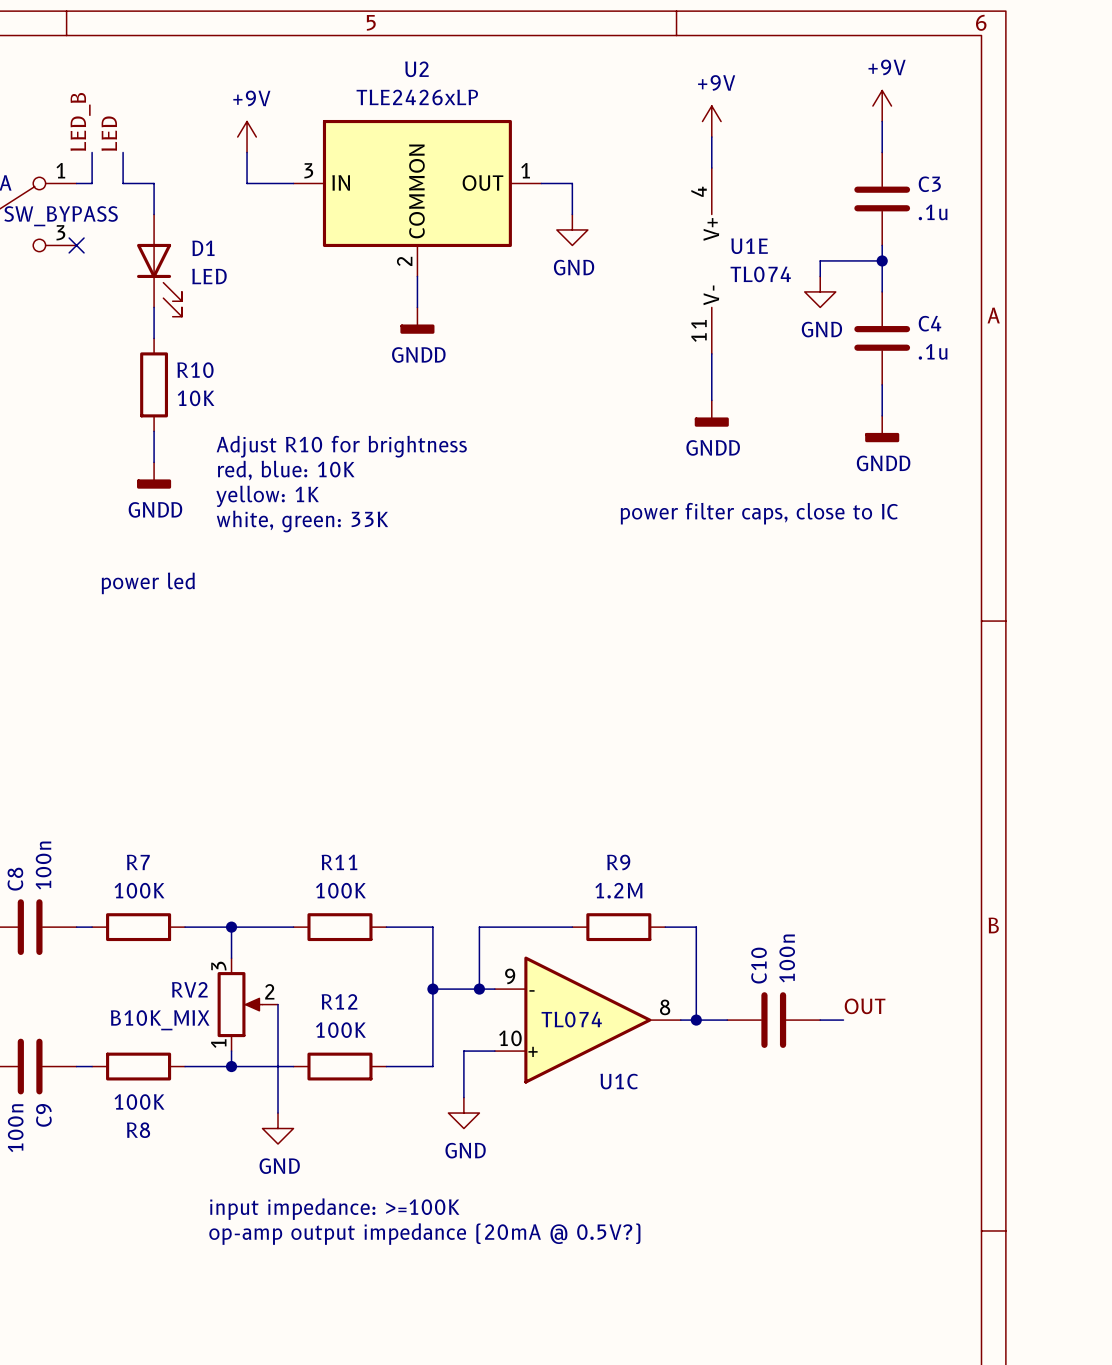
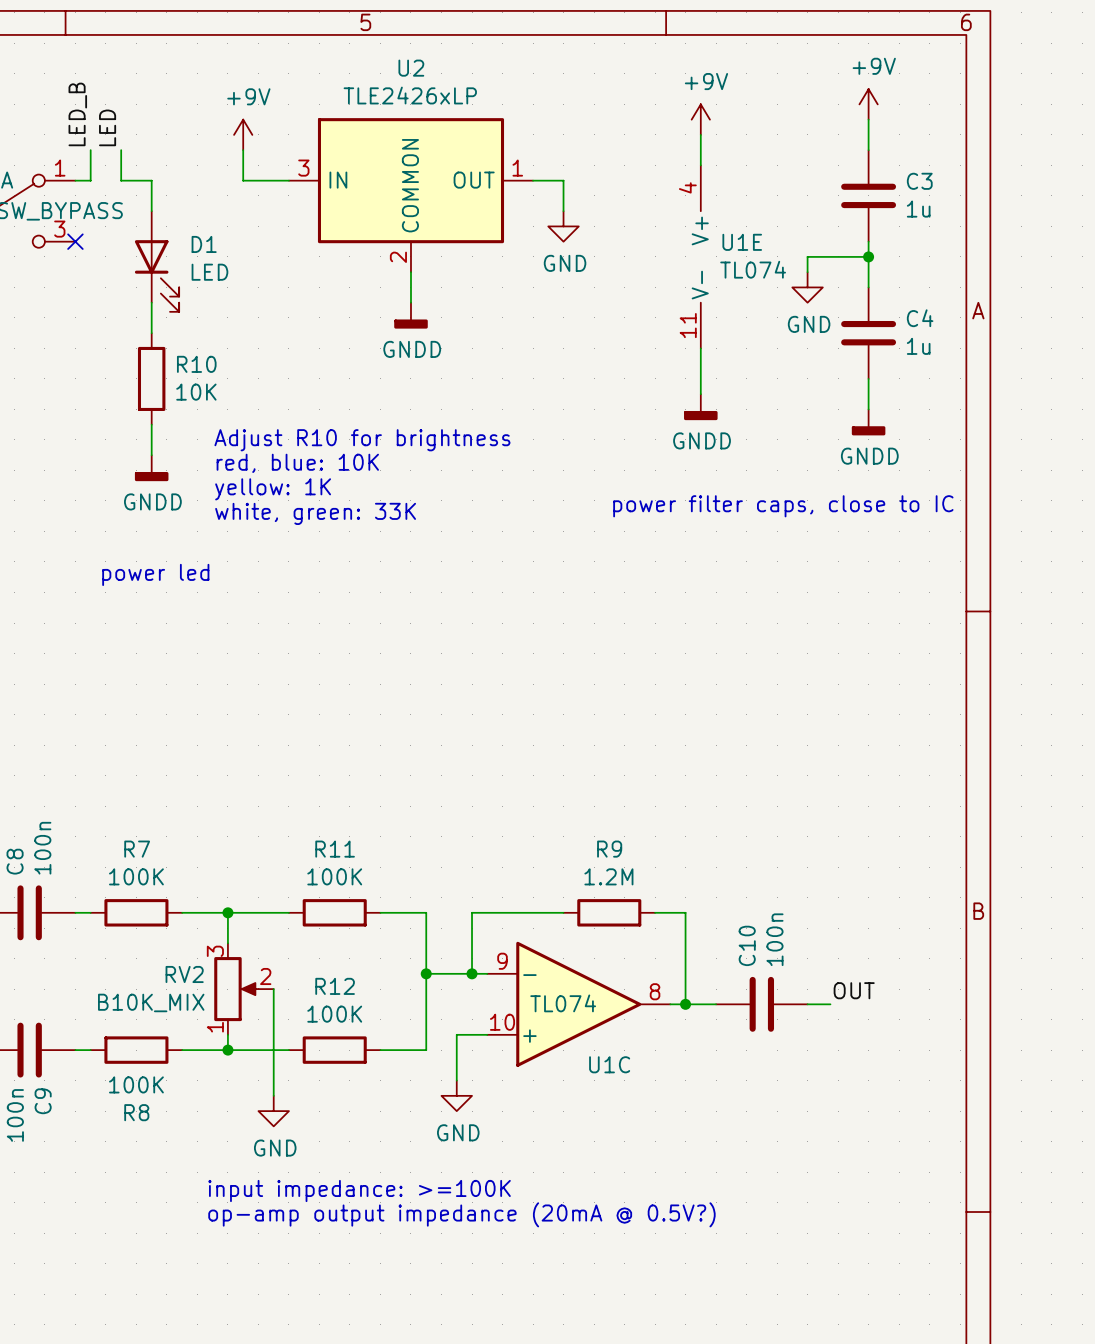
C3 value: .1u (933, 212) -> 1u (918, 209)
C4 value: .1u (933, 351) -> 1u (918, 346)

